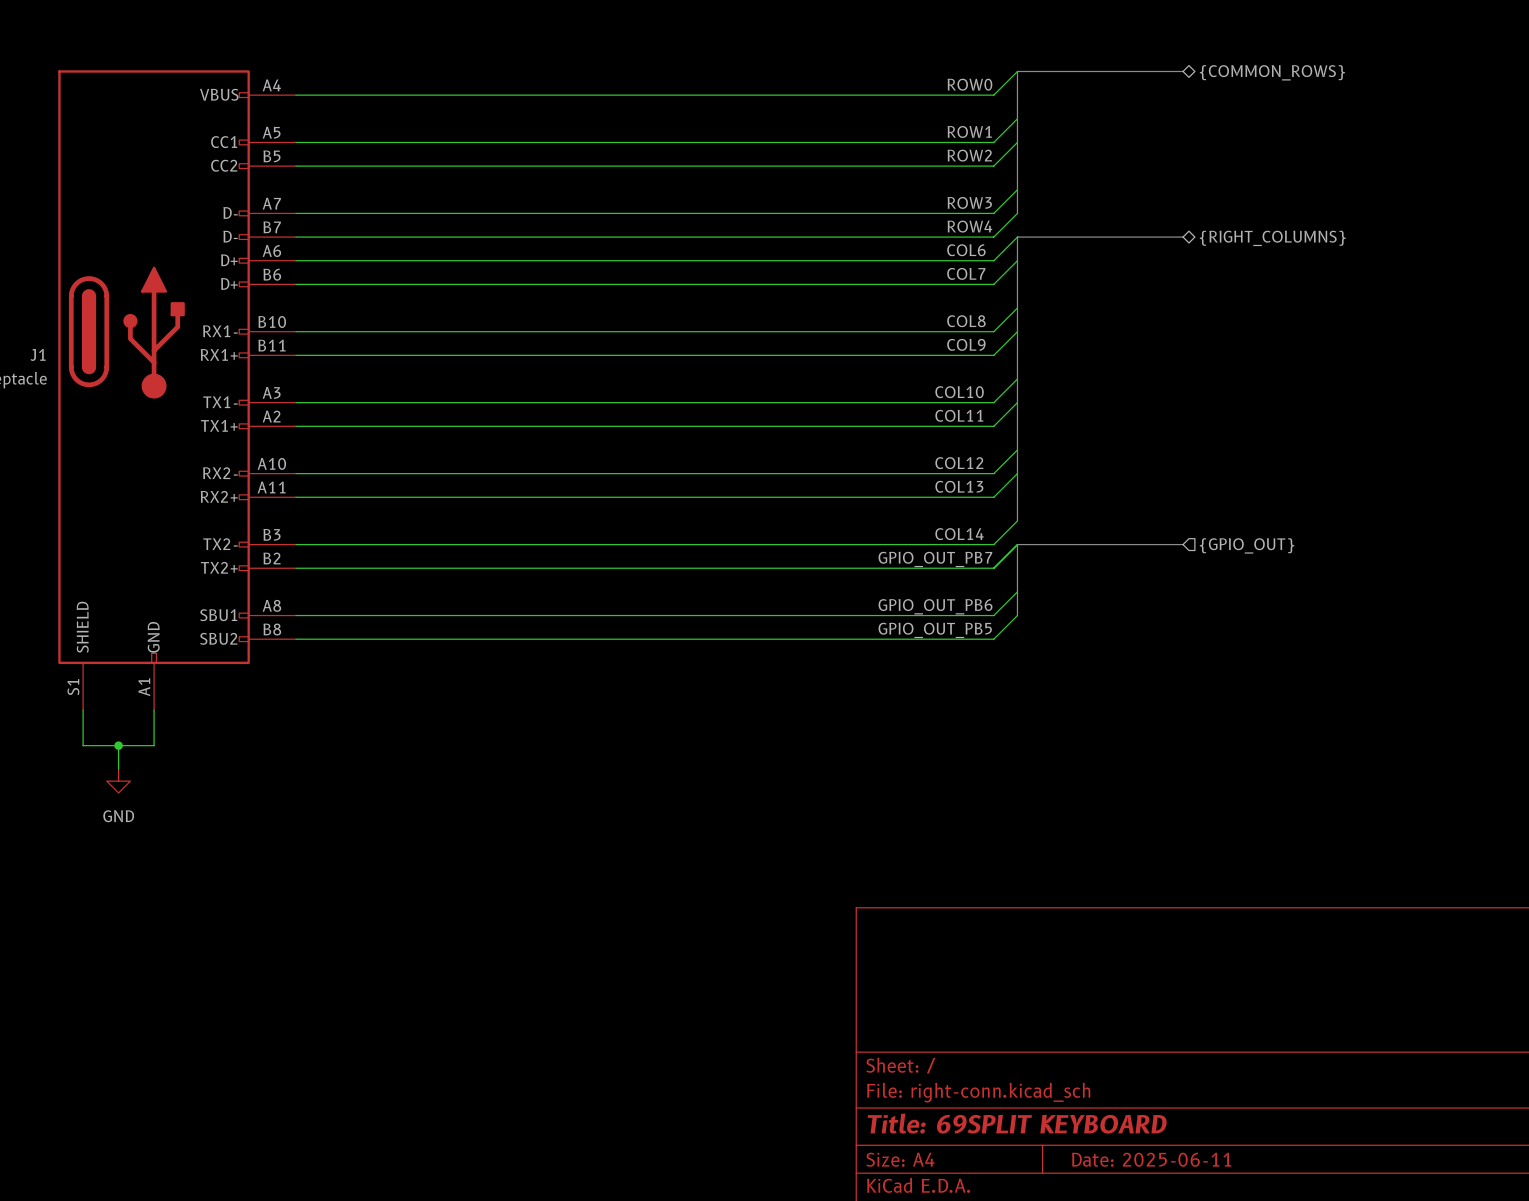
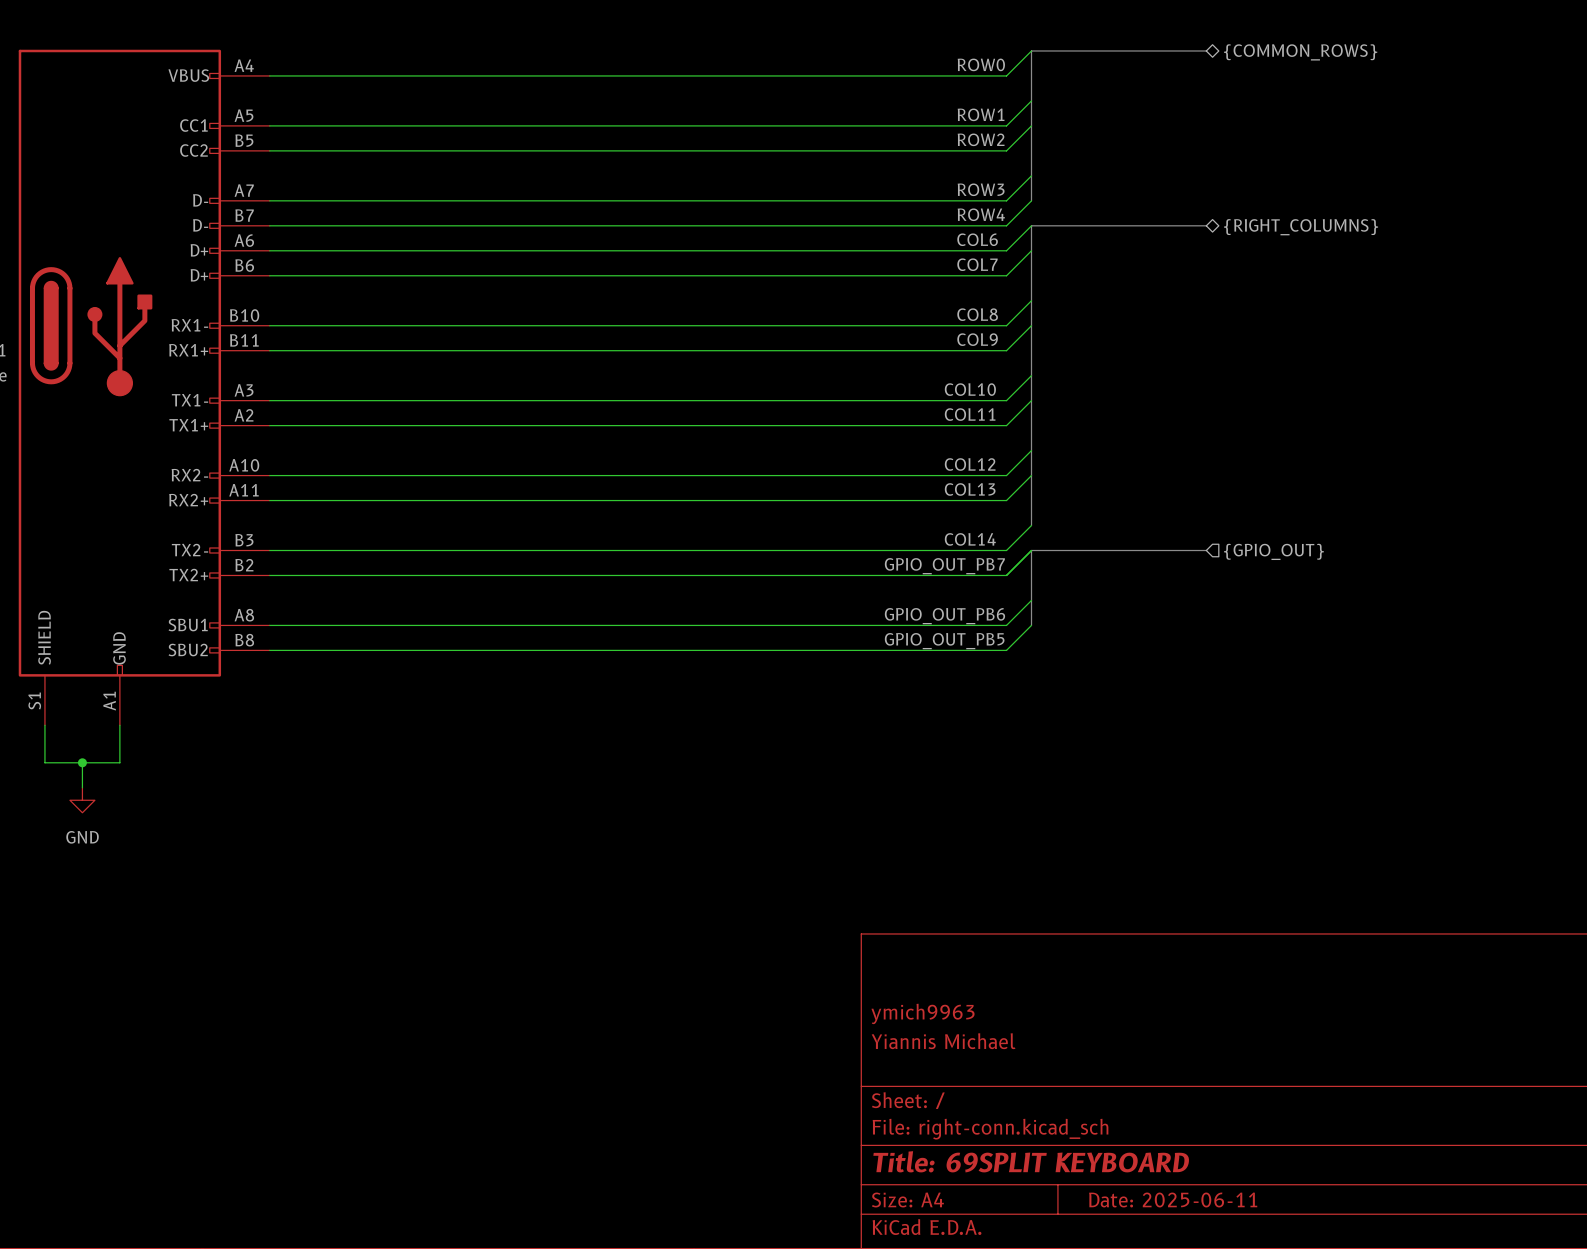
title block: none -> ymich9963 (923, 1013)
title block: none -> Yiannis Michael (943, 1041)

